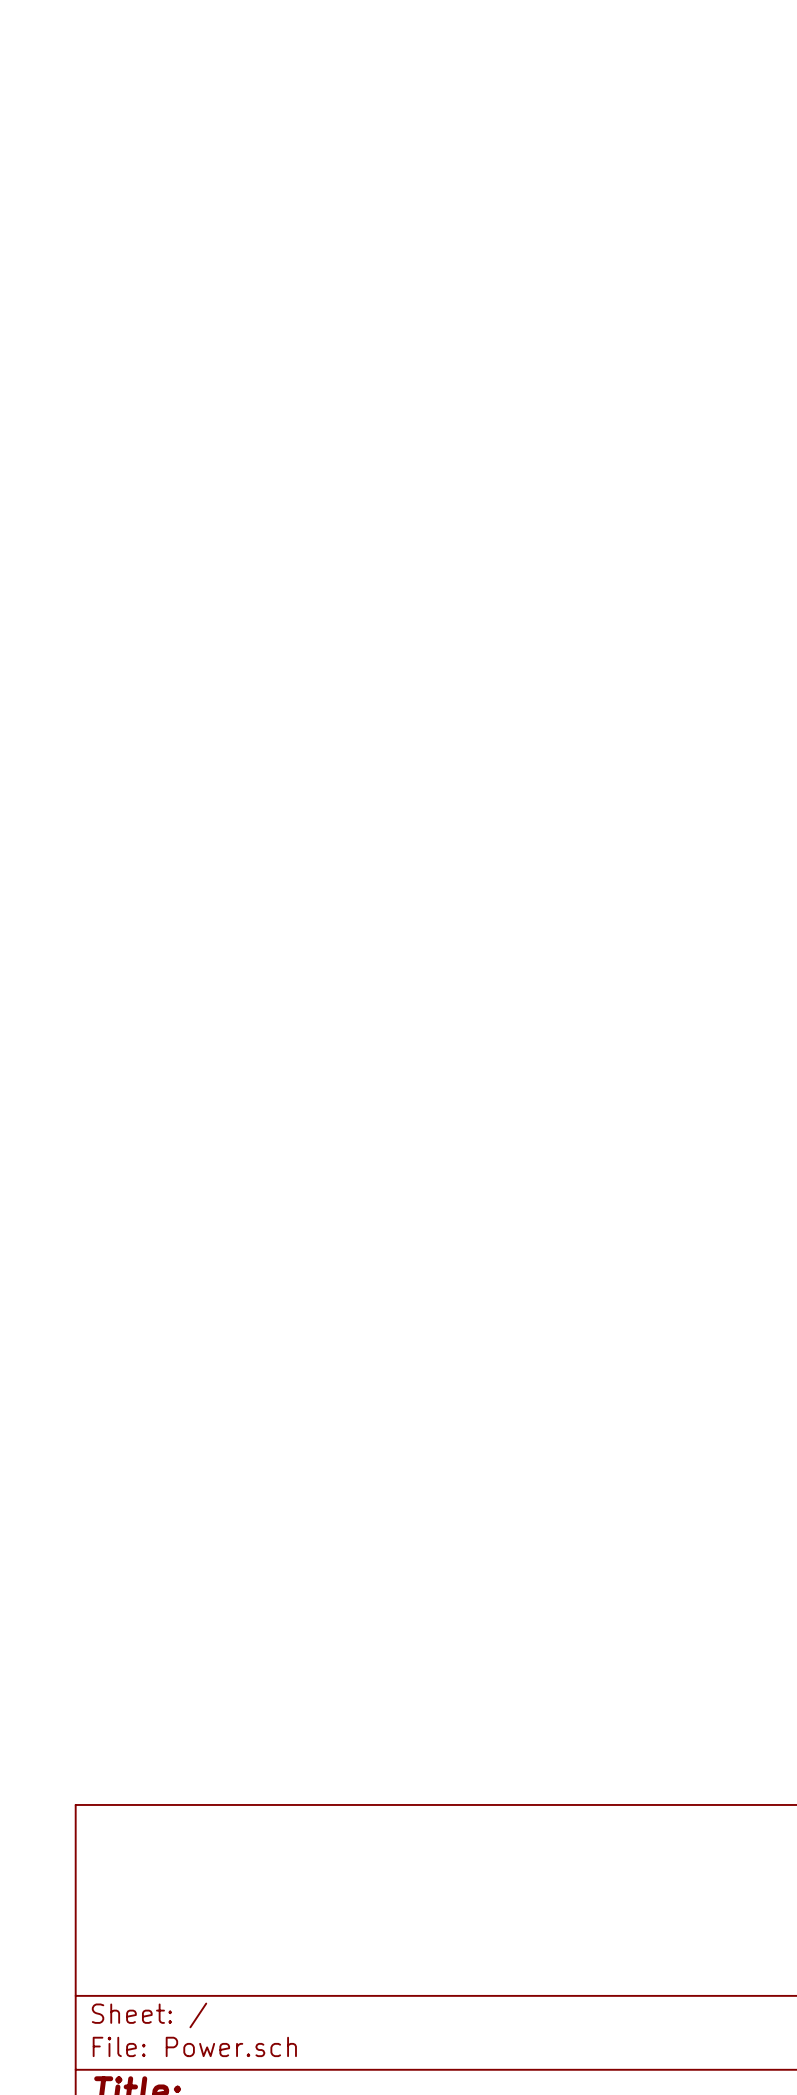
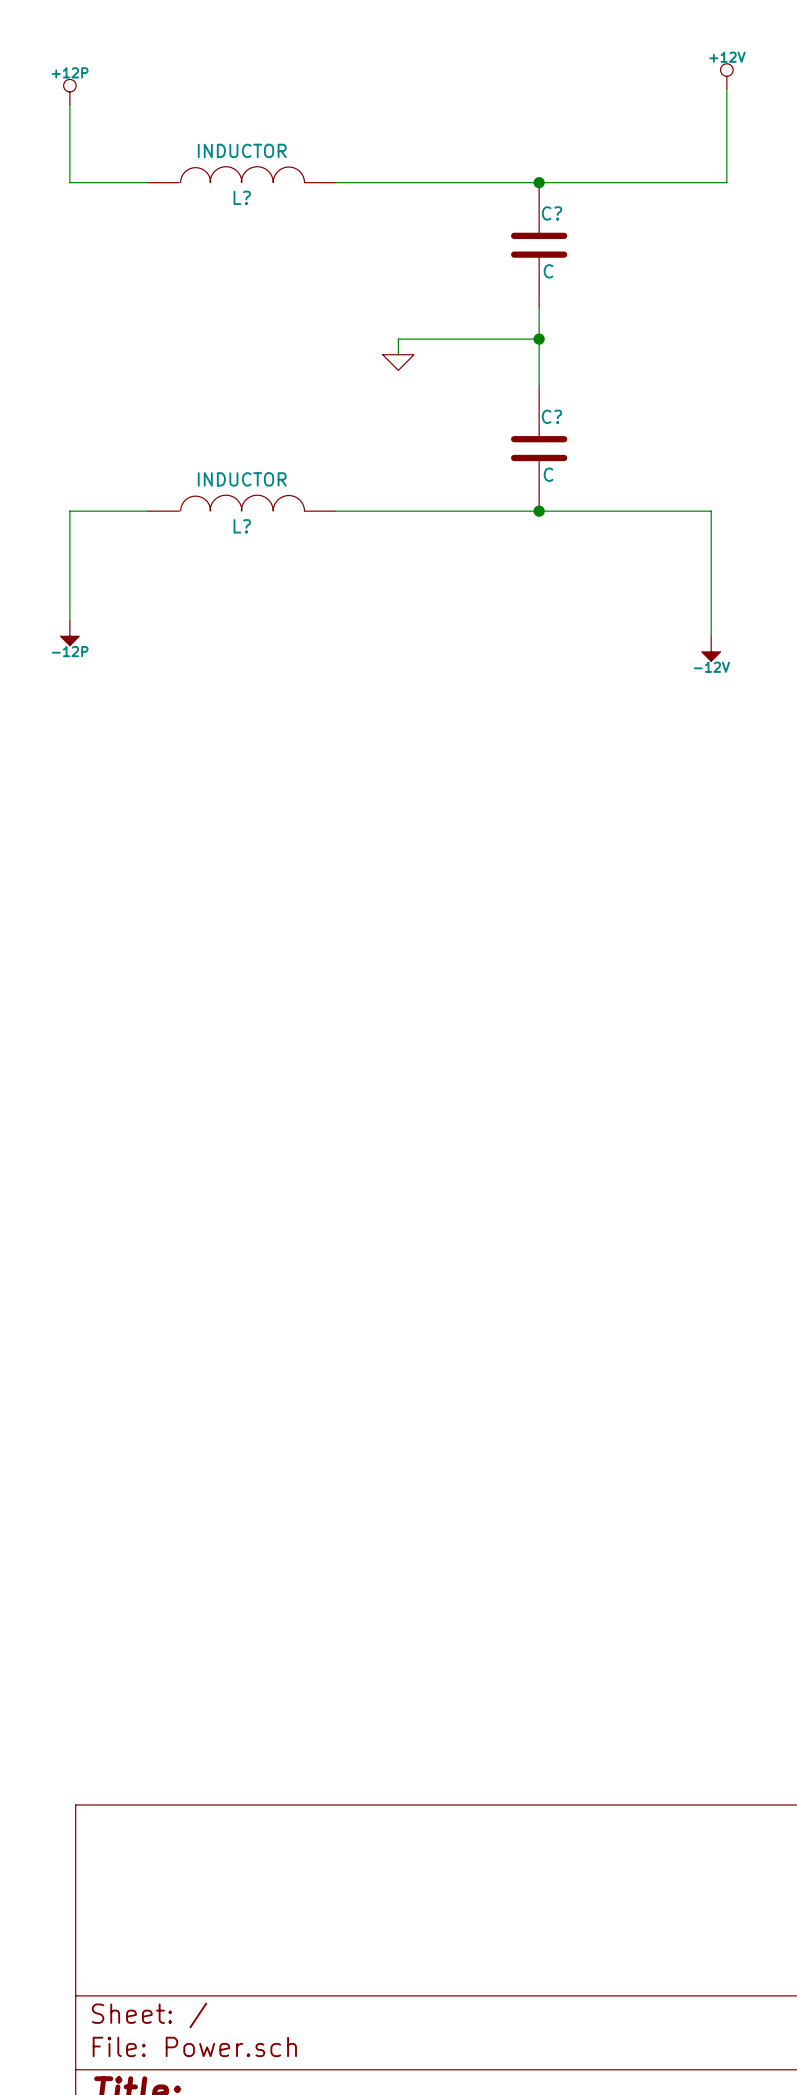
power symbol: none -> +12V (726, 76)
wire: none -> (726, 88) (726, 182) (335, 182)
power symbol: none -> +12P (69, 91)
wire: none -> (69, 104) (69, 182) (148, 182)
L?: none -> INDUCTOR (241, 174)
junction: none -> (539, 182)
C?: none -> C (539, 245)
wire: none -> (539, 307) (539, 386)
wire: none -> (539, 339) (398, 339) (398, 354)
junction: none -> (539, 339)
power symbol: none -> (398, 362)
C?: none -> C (539, 448)
L?: none -> INDUCTOR (241, 503)
wire: none -> (148, 511) (69, 511) (69, 620)
wire: none -> (335, 511) (711, 511) (711, 636)
junction: none -> (539, 511)
power symbol: none -> -12P (69, 633)
power symbol: none -> -12V (711, 648)

